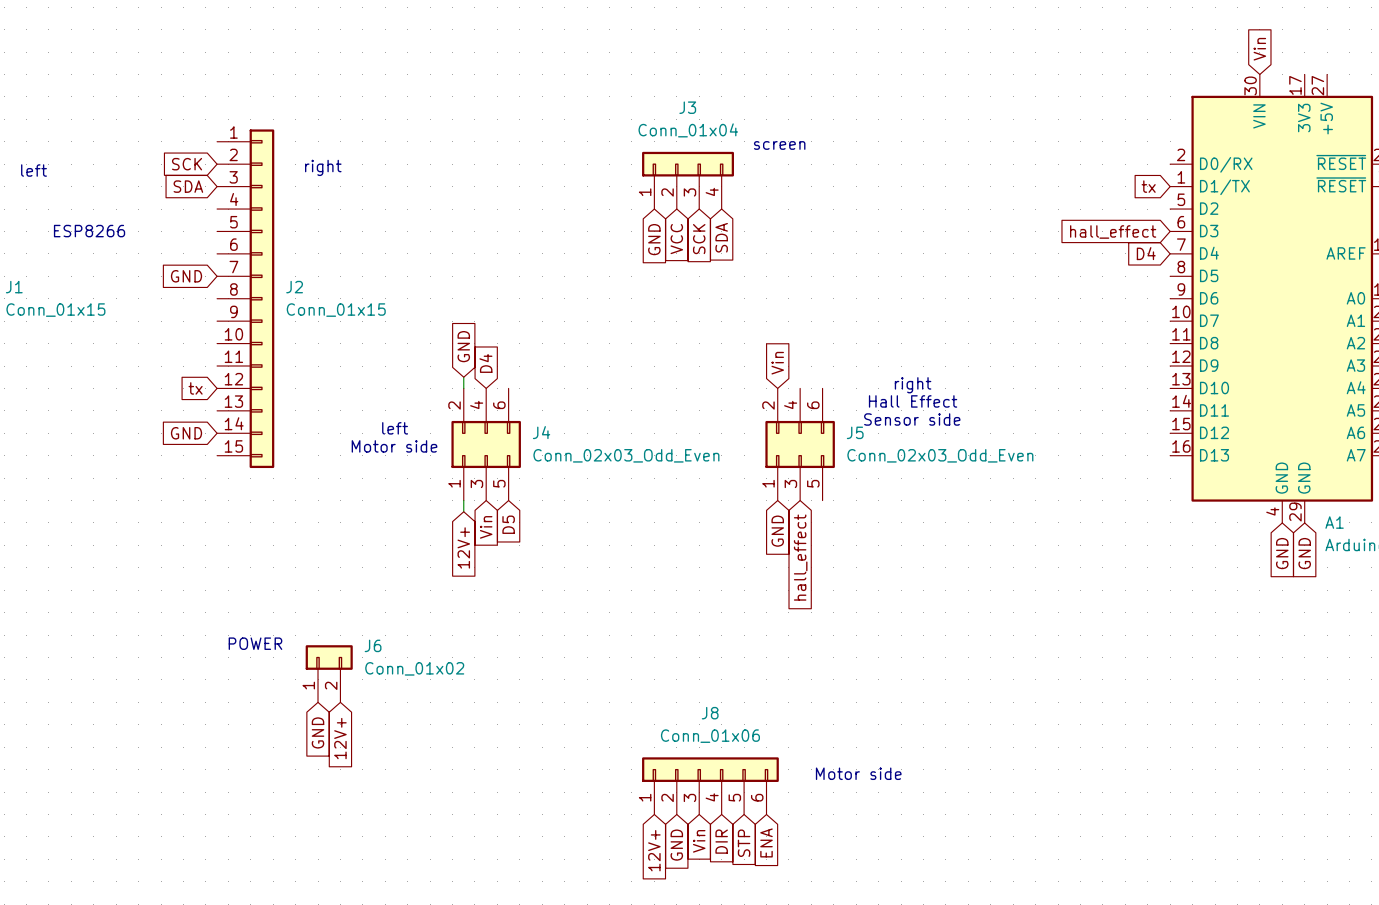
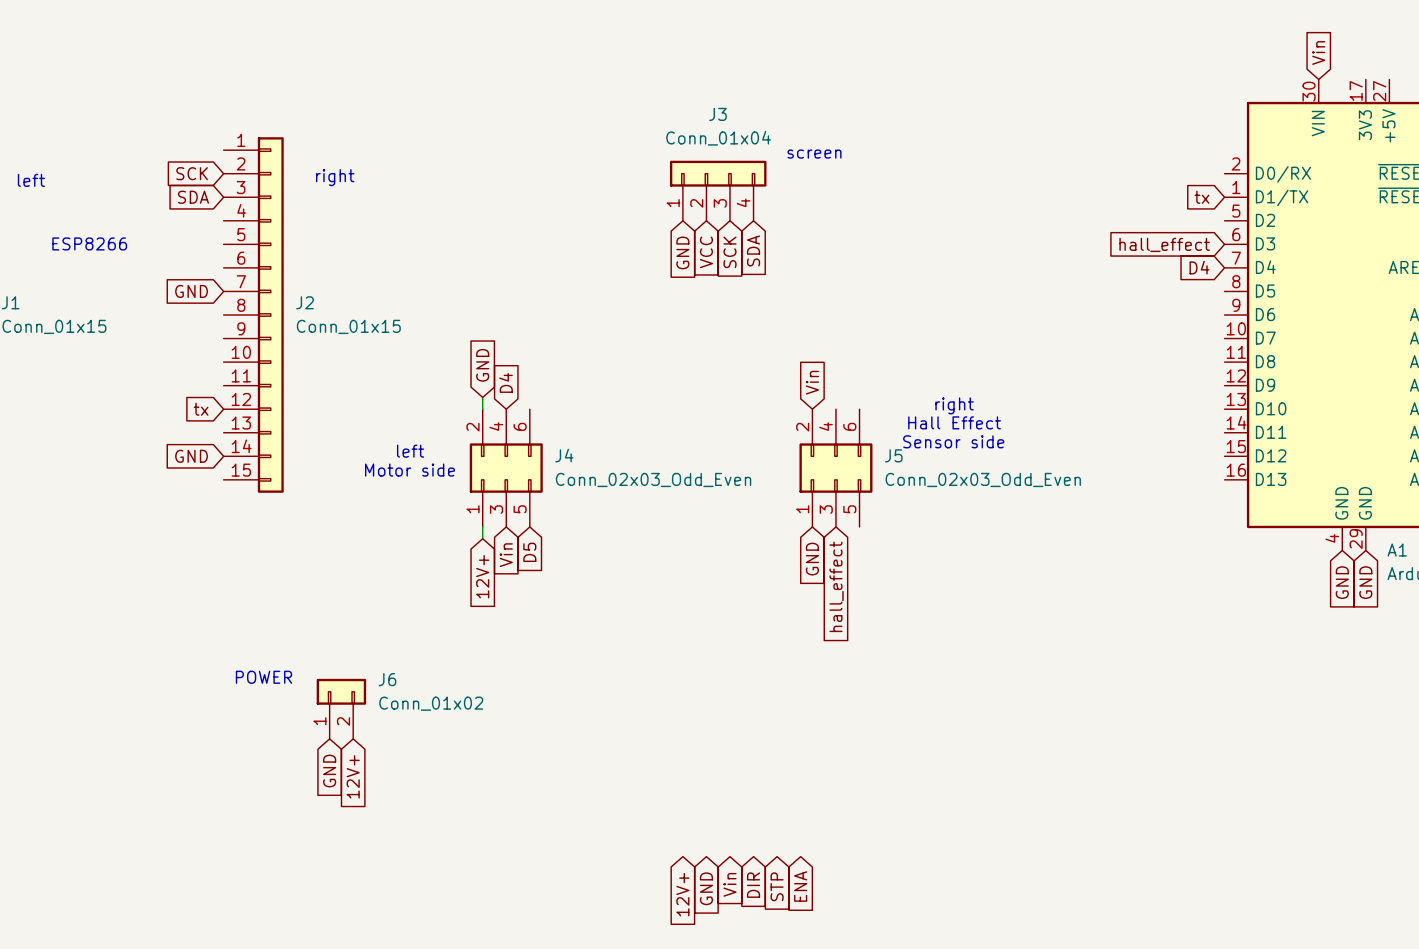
text: Motor side (858, 773) -> none
J8: Conn_01x06 (710, 785) -> none

